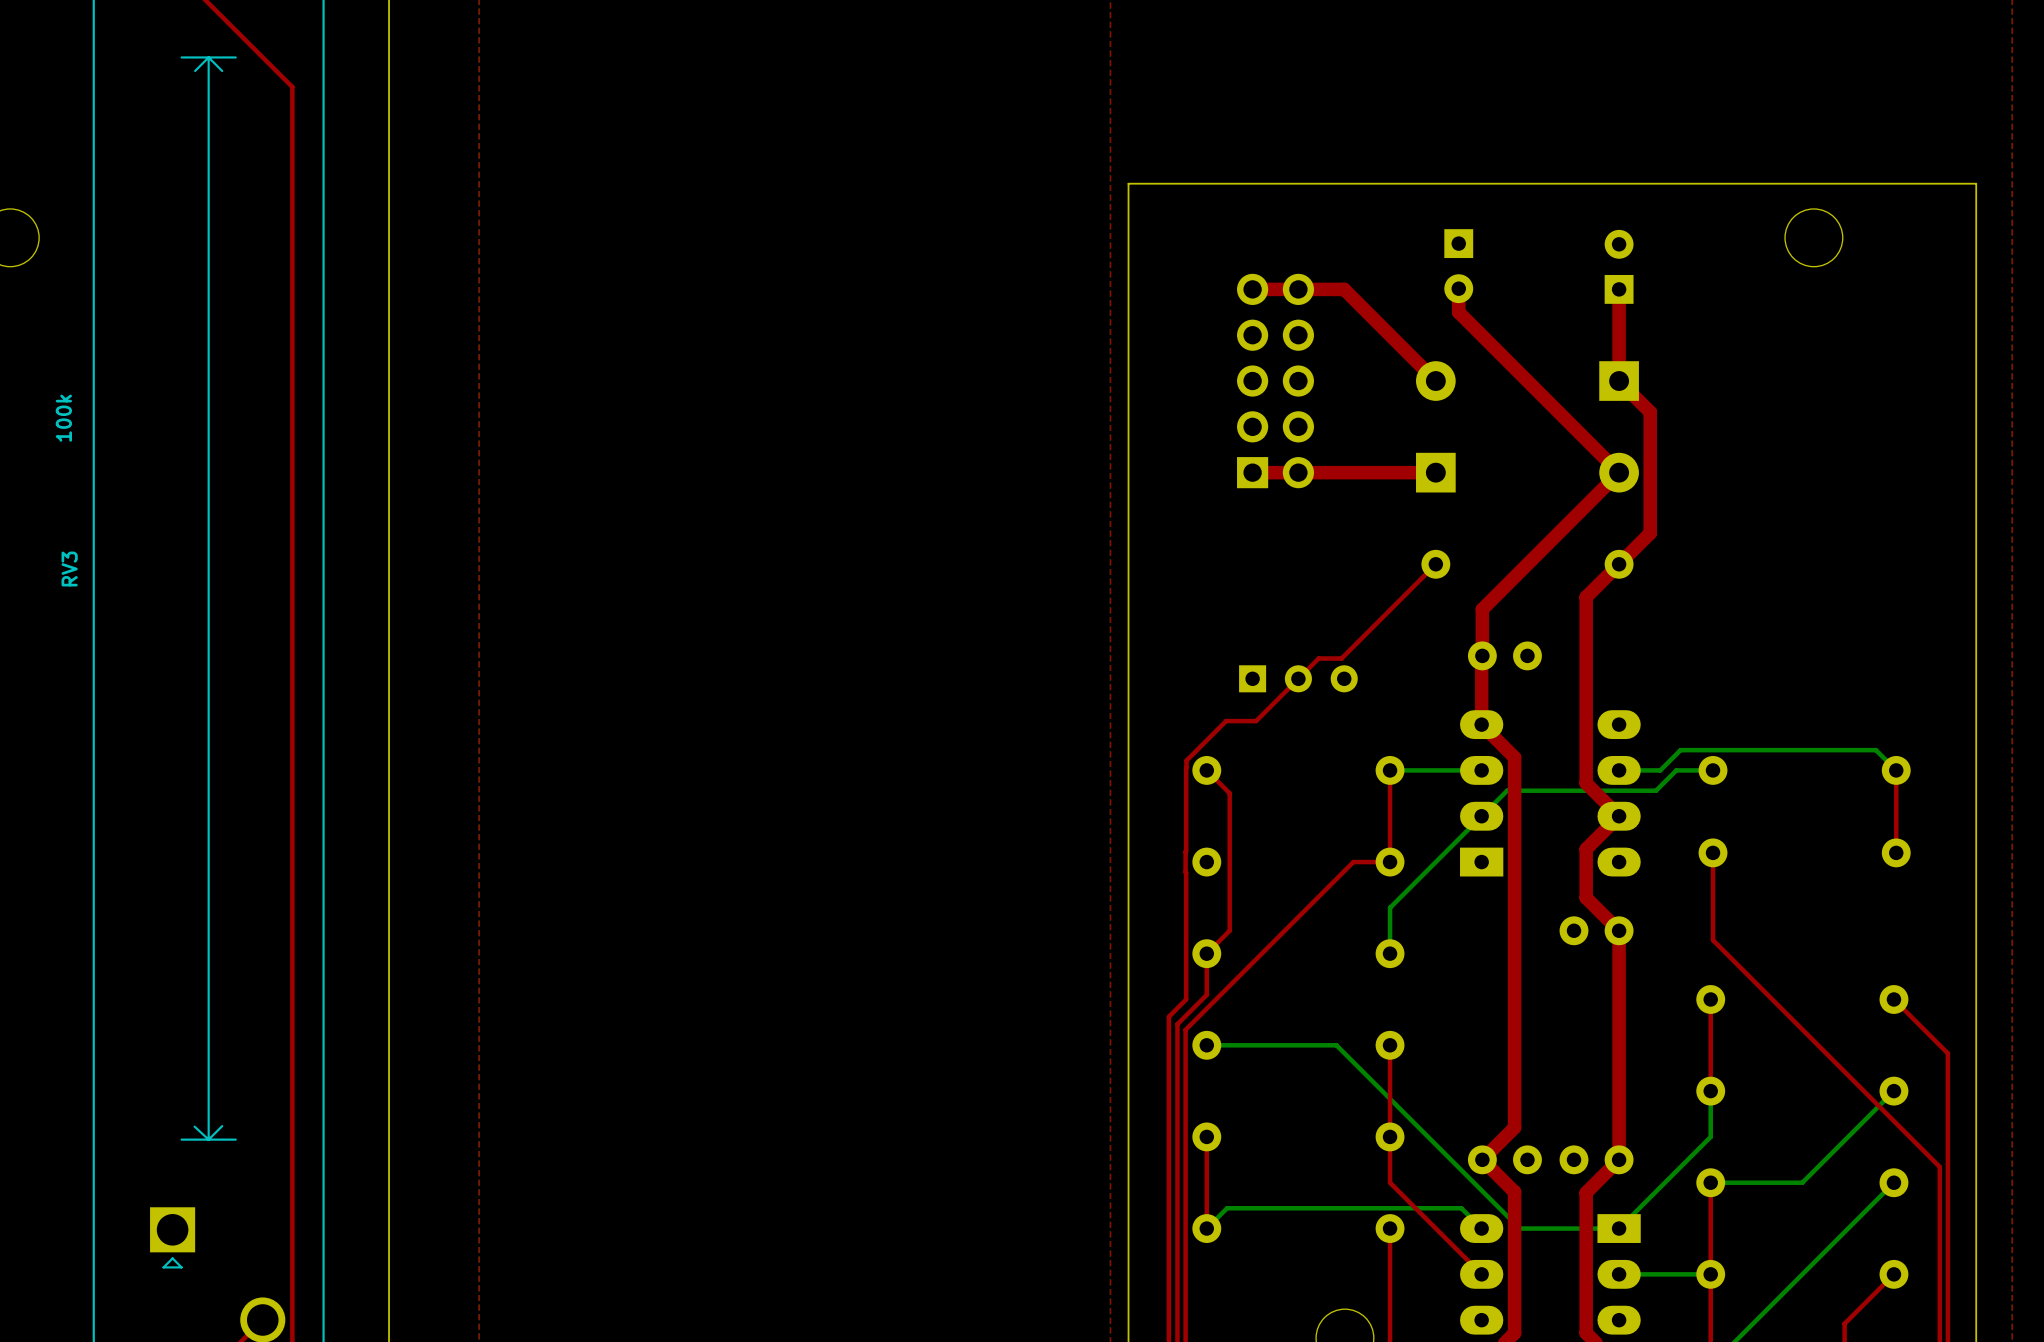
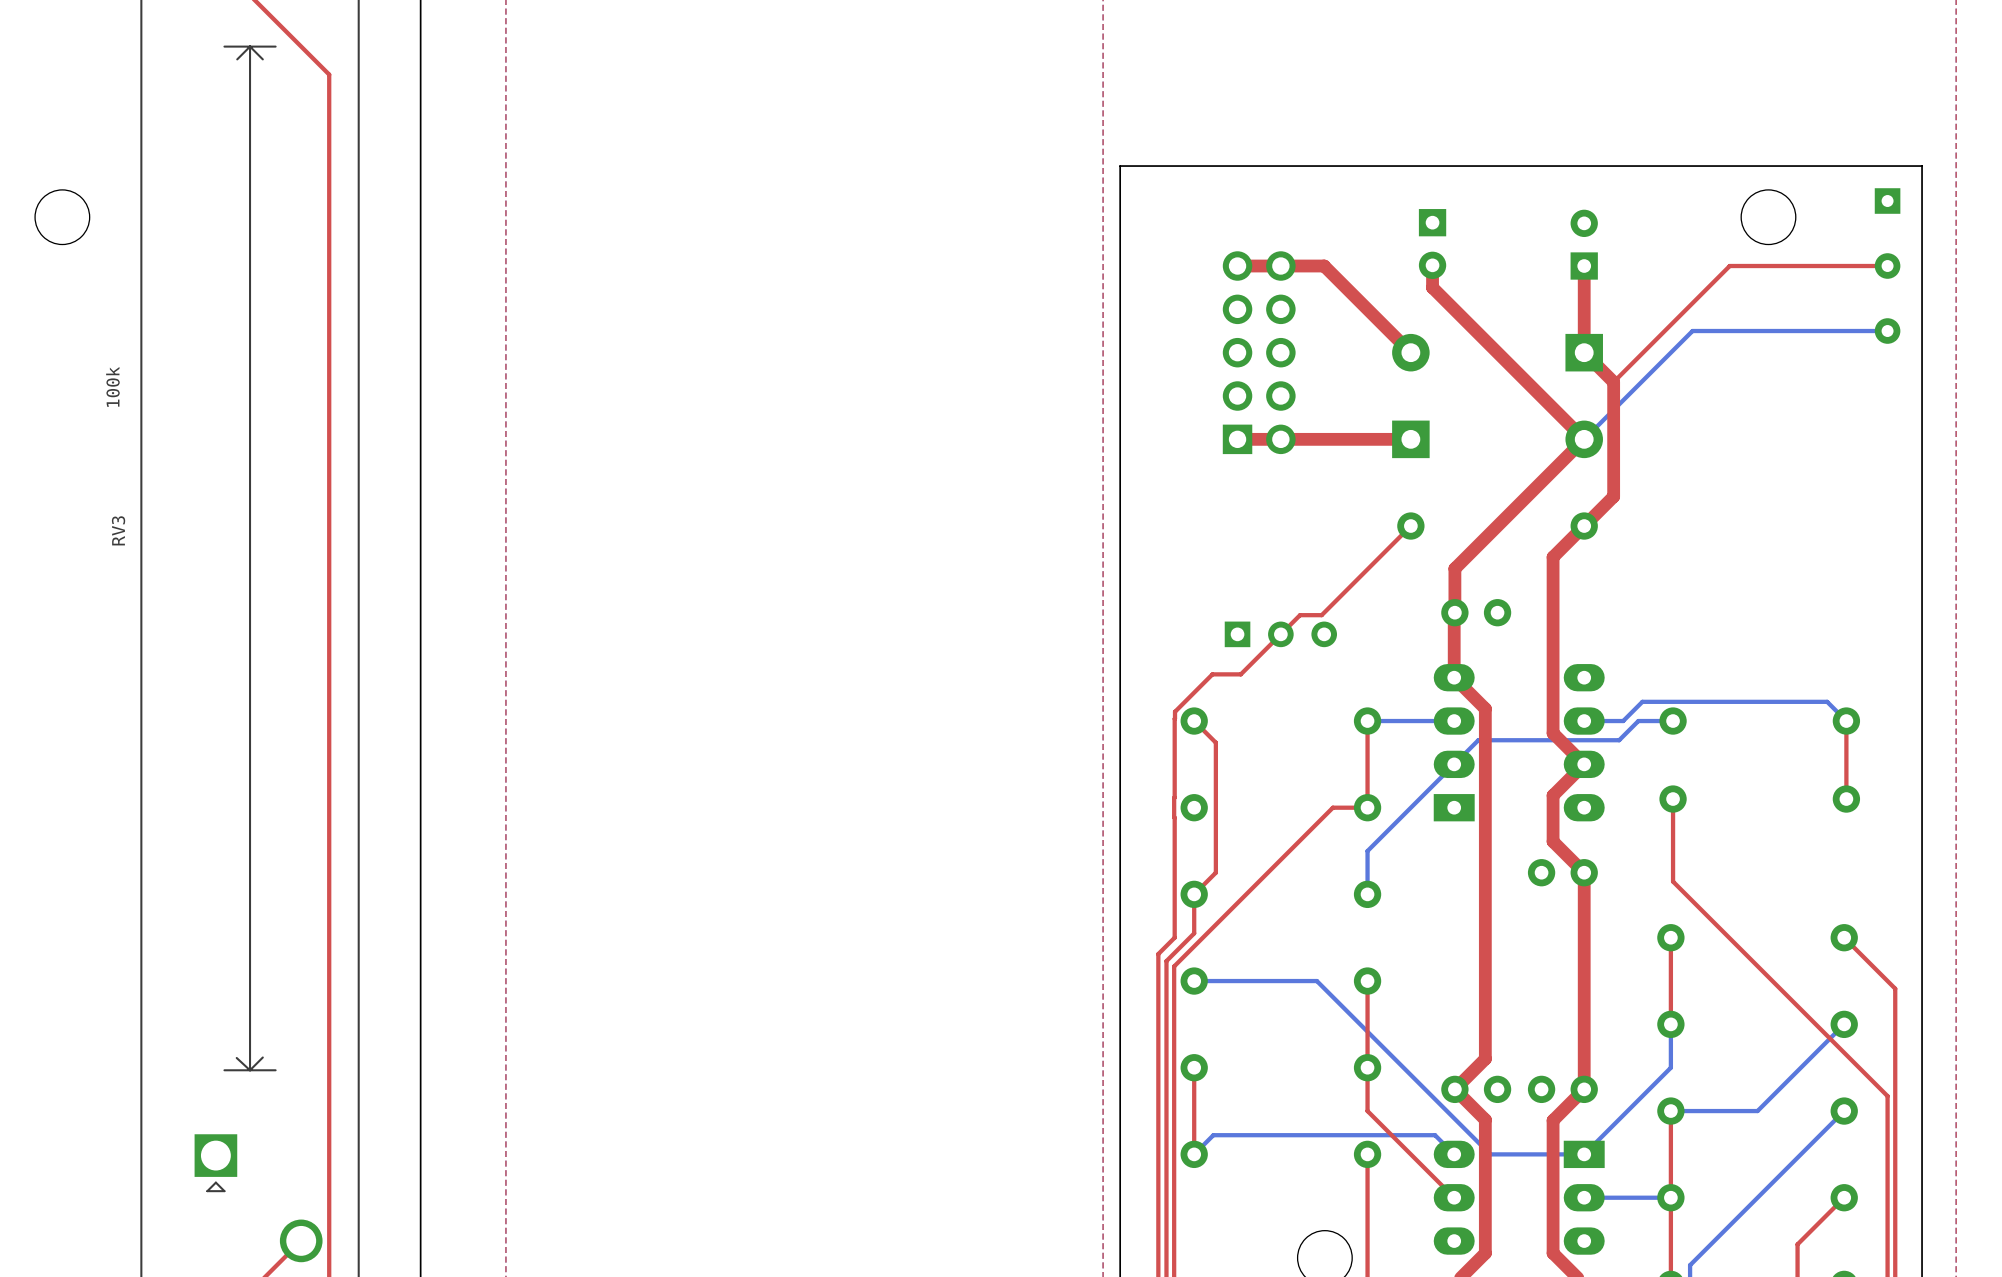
part: none -> (1887, 201)
top track: none -> (1887, 266) (1729, 266) (1613, 382)
part: none -> (1887, 266)
bottom track: none -> (1887, 331) (1692, 331) (1584, 439)
part: none -> (1887, 331)

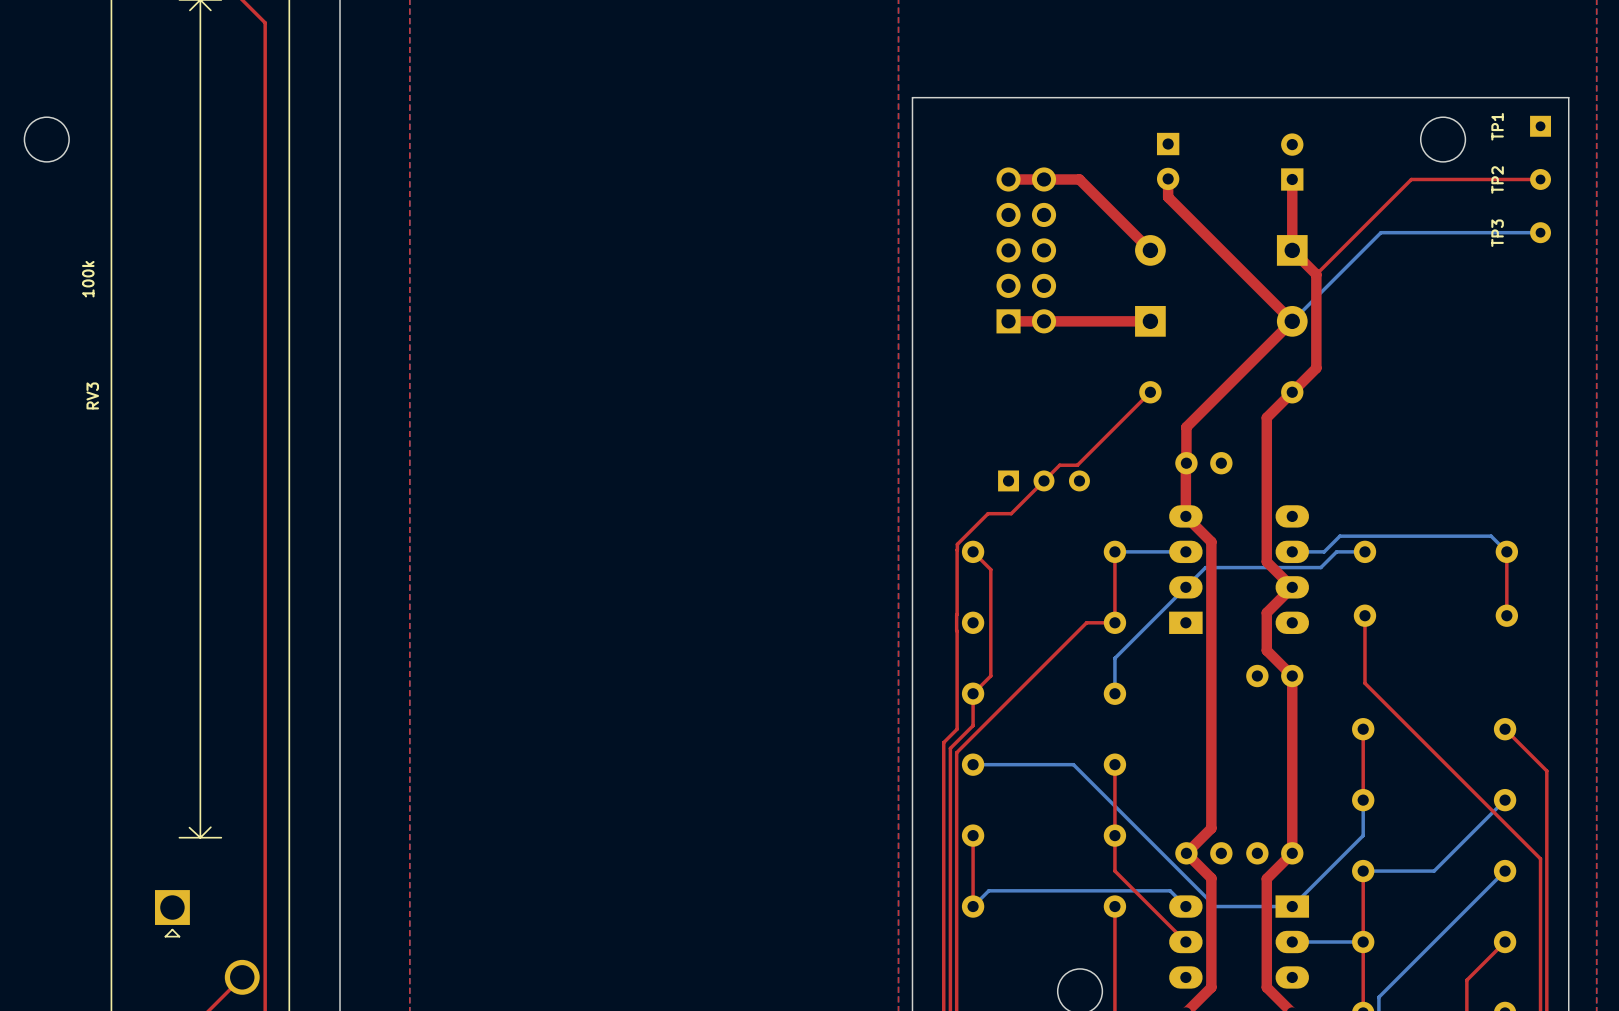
TP1 name: none -> TP1 (1497, 126)
TP2 name: none -> TP2 (1497, 179)
TP3 name: none -> TP3 (1497, 233)

